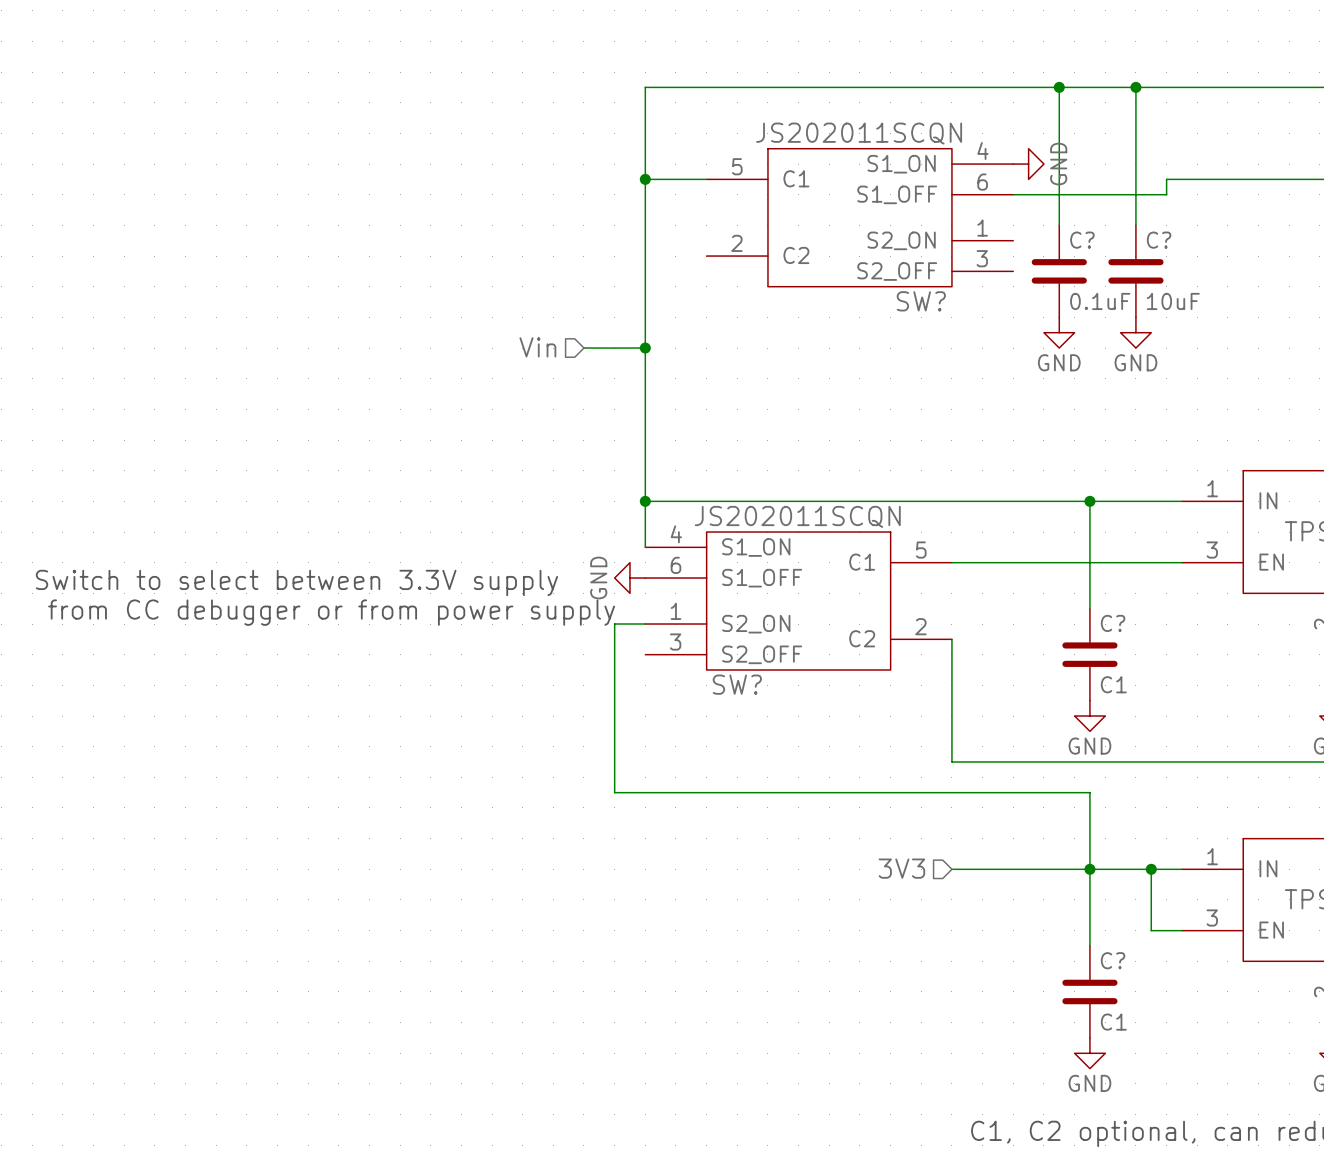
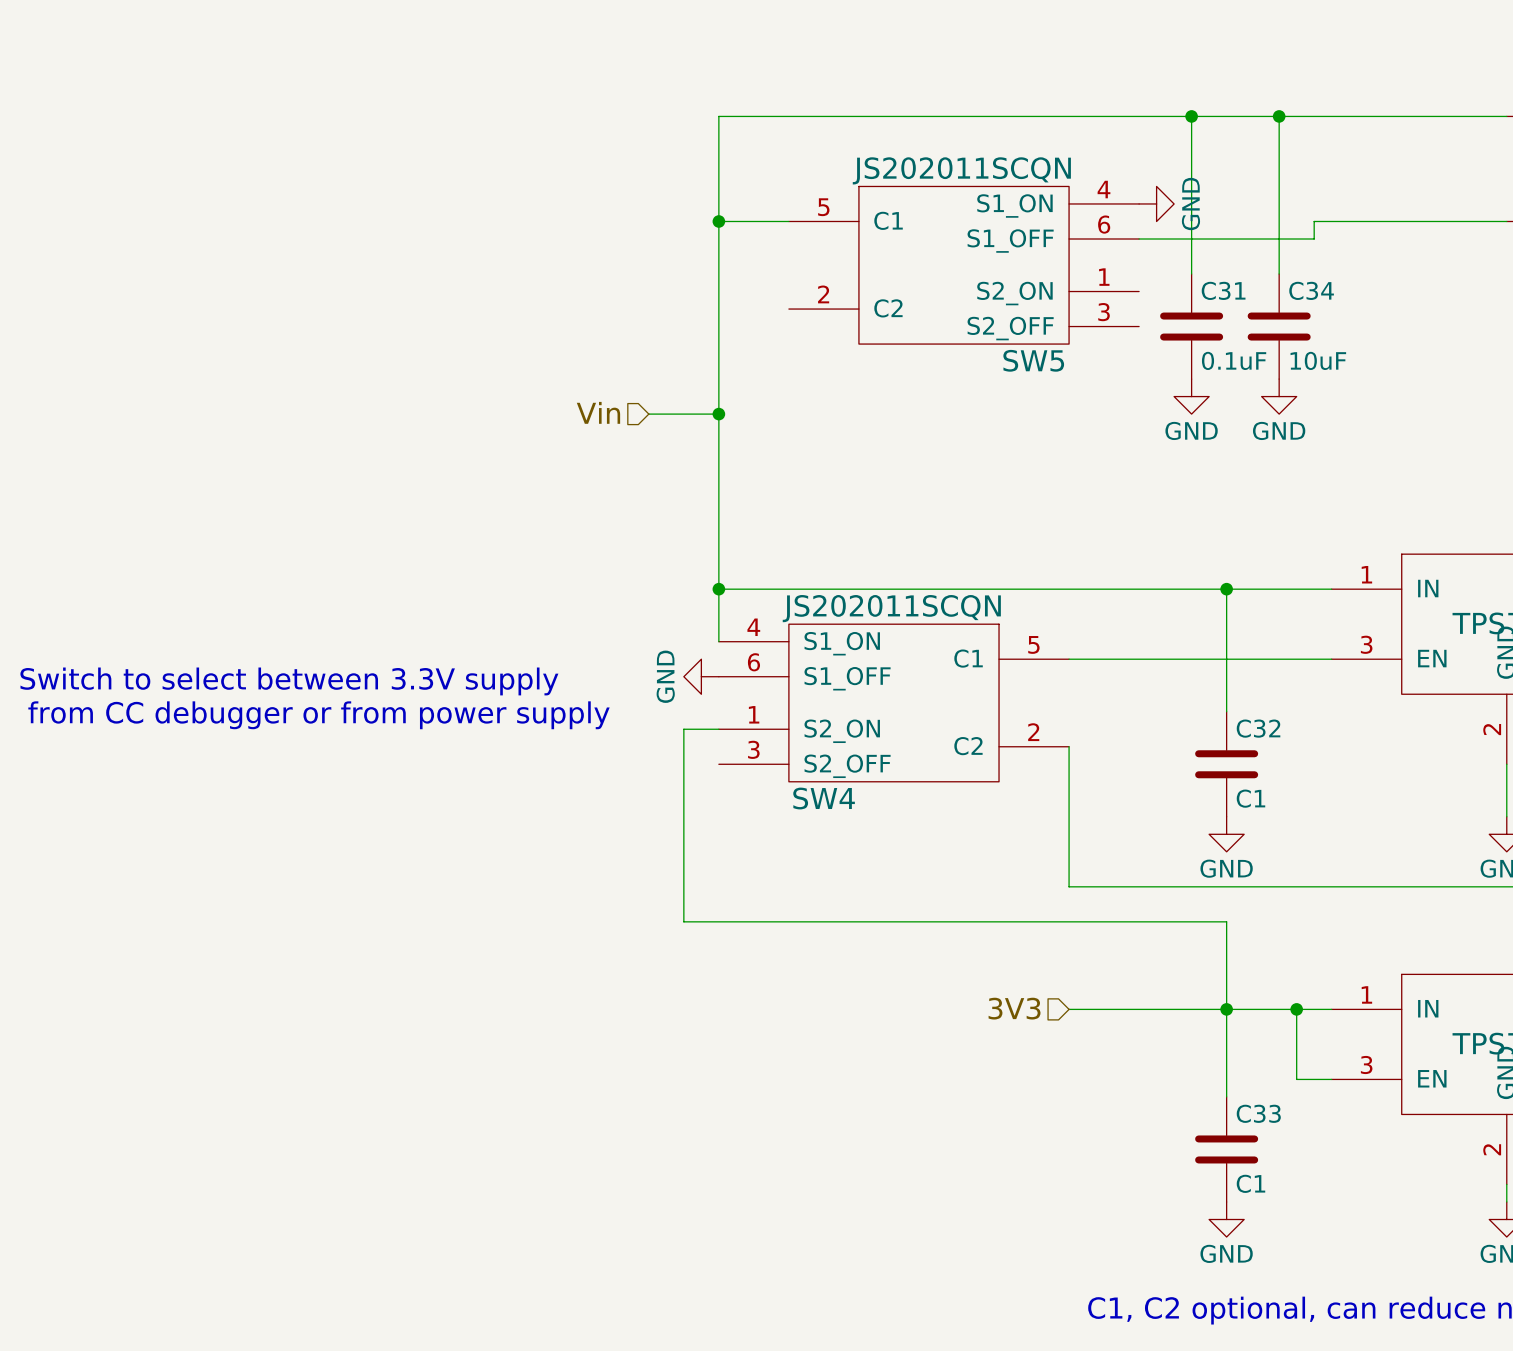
C? name: C? (1082, 240) -> C31 (1223, 290)
C? name: C? (1159, 240) -> C34 (1311, 290)
SW? name: SW? (921, 301) -> SW5 (1033, 360)
C? name: C? (1113, 623) -> C32 (1258, 728)
SW? name: SW? (737, 684) -> SW4 (824, 798)
C? name: C? (1113, 960) -> C33 (1258, 1113)

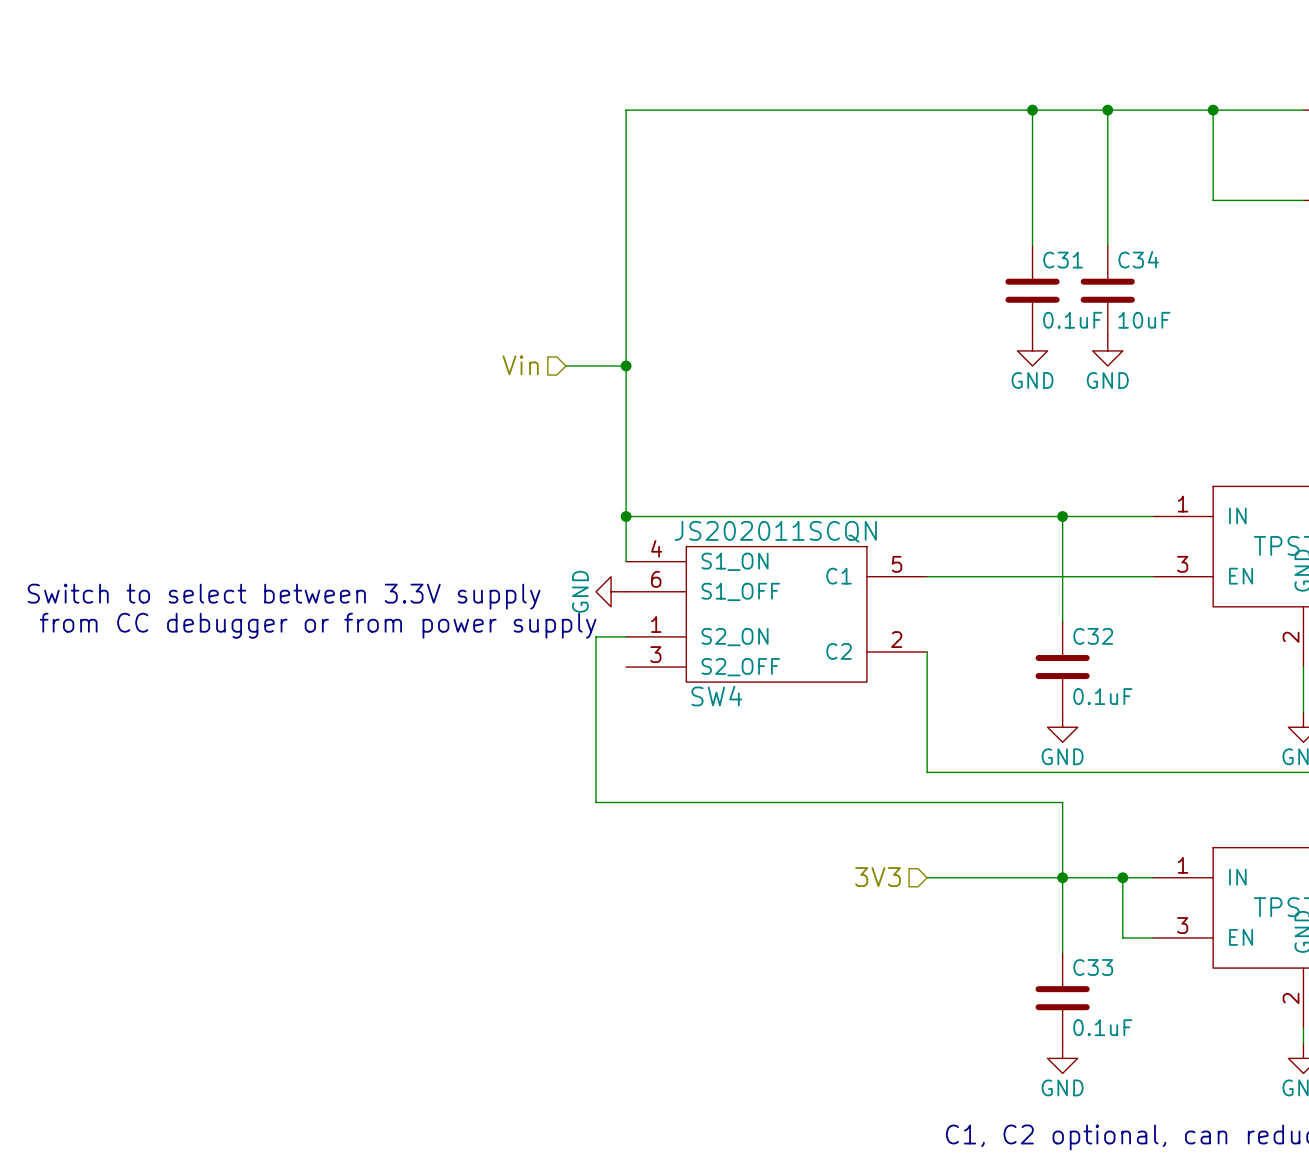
junction: none -> (1213, 110)
power symbol: GND (1156, 203) -> none
wire: (718, 221) (788, 221) -> none
junction: (718, 221) -> none
wire: (1401, 221) (1314, 221) (1314, 239) (1139, 239) -> (1213, 200) (1213, 110)
SW5: JS202011SCQN (964, 265) -> none
C32 value: C1 (1250, 798) -> 0.1uF (1102, 696)
C33 value: C1 (1250, 1183) -> 0.1uF (1102, 1027)

